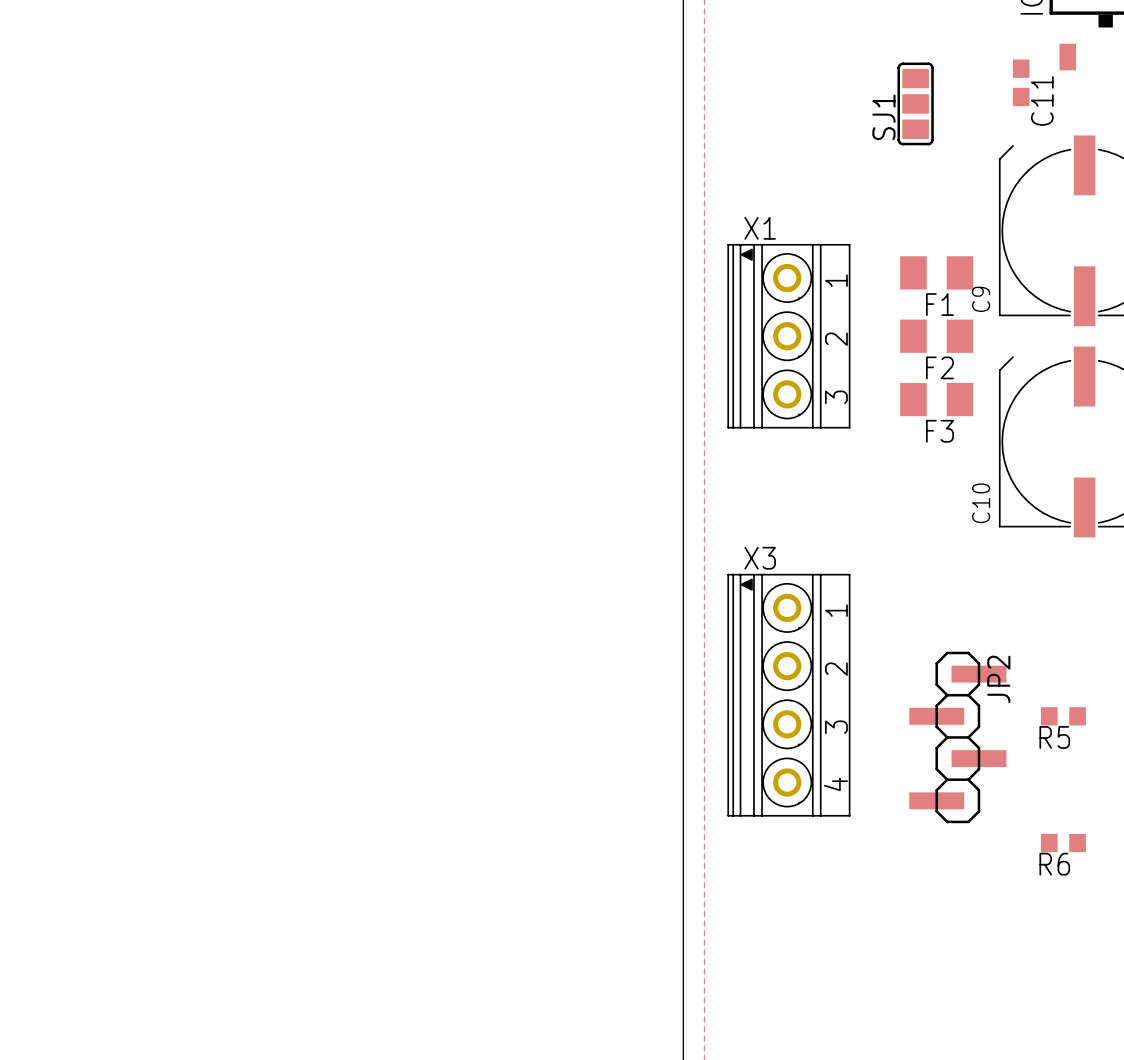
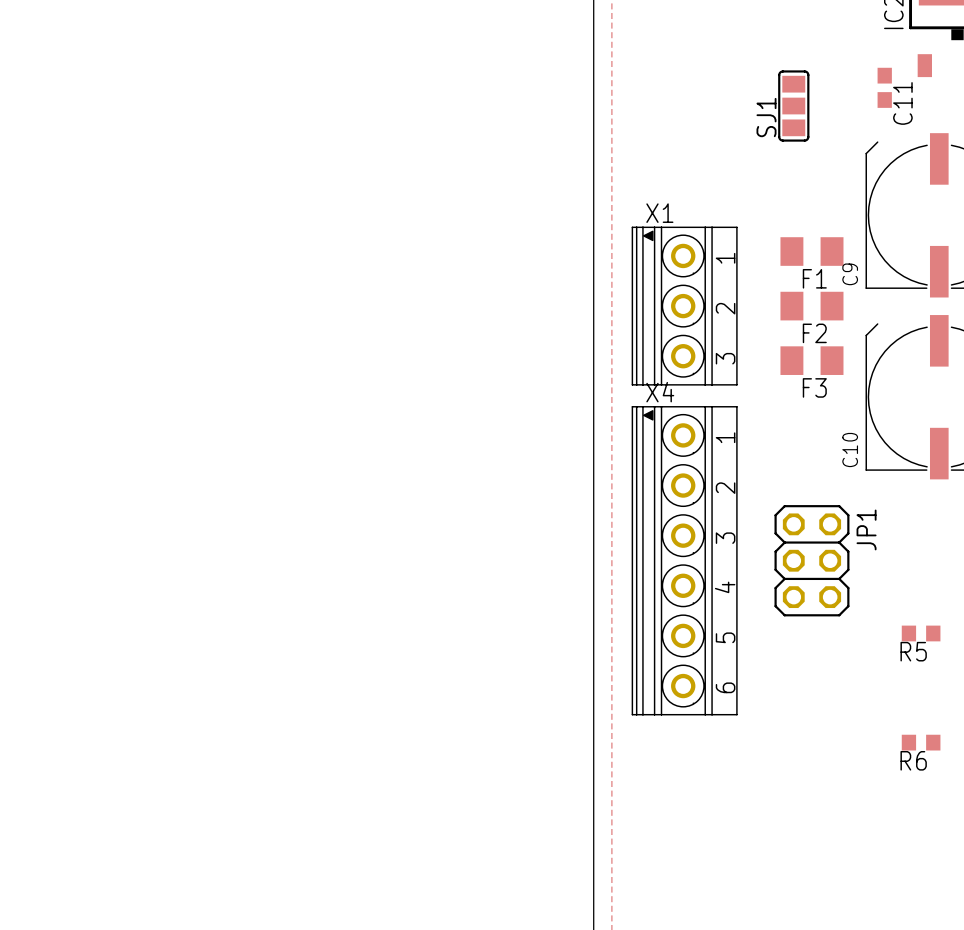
X4: none -> (684, 560)
JP1: none -> (811, 560)
X3: (788, 695) -> none
JP2: (957, 737) -> none

